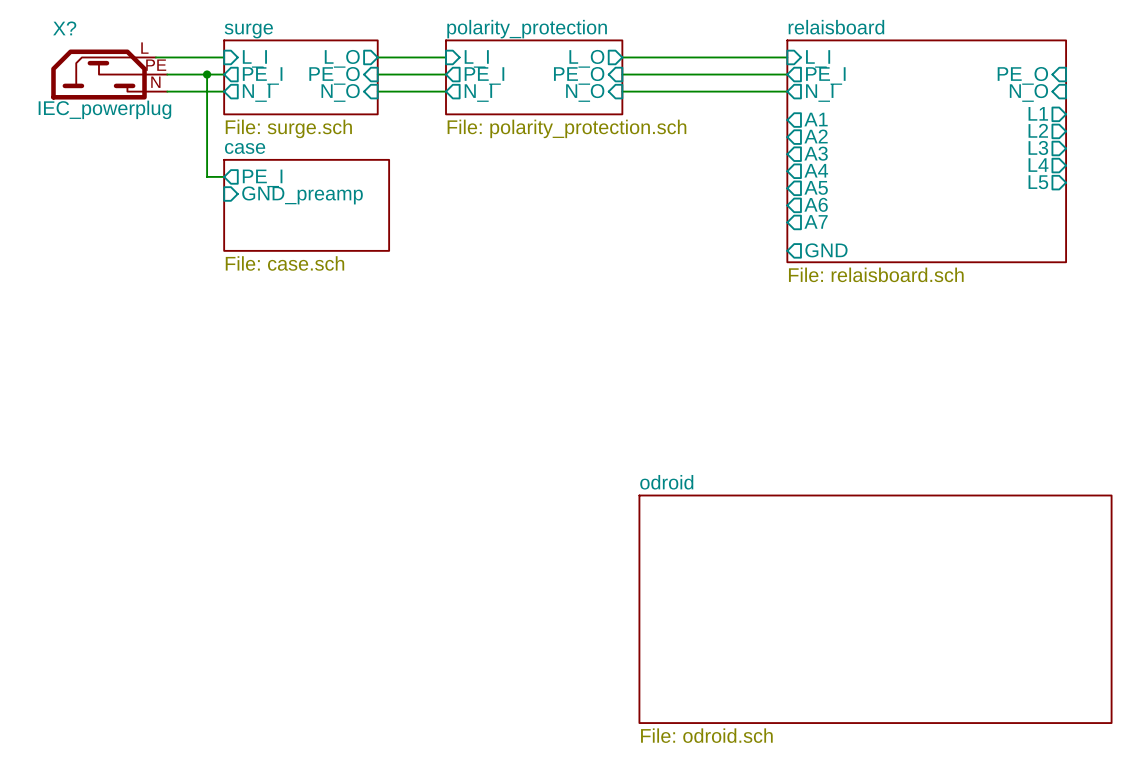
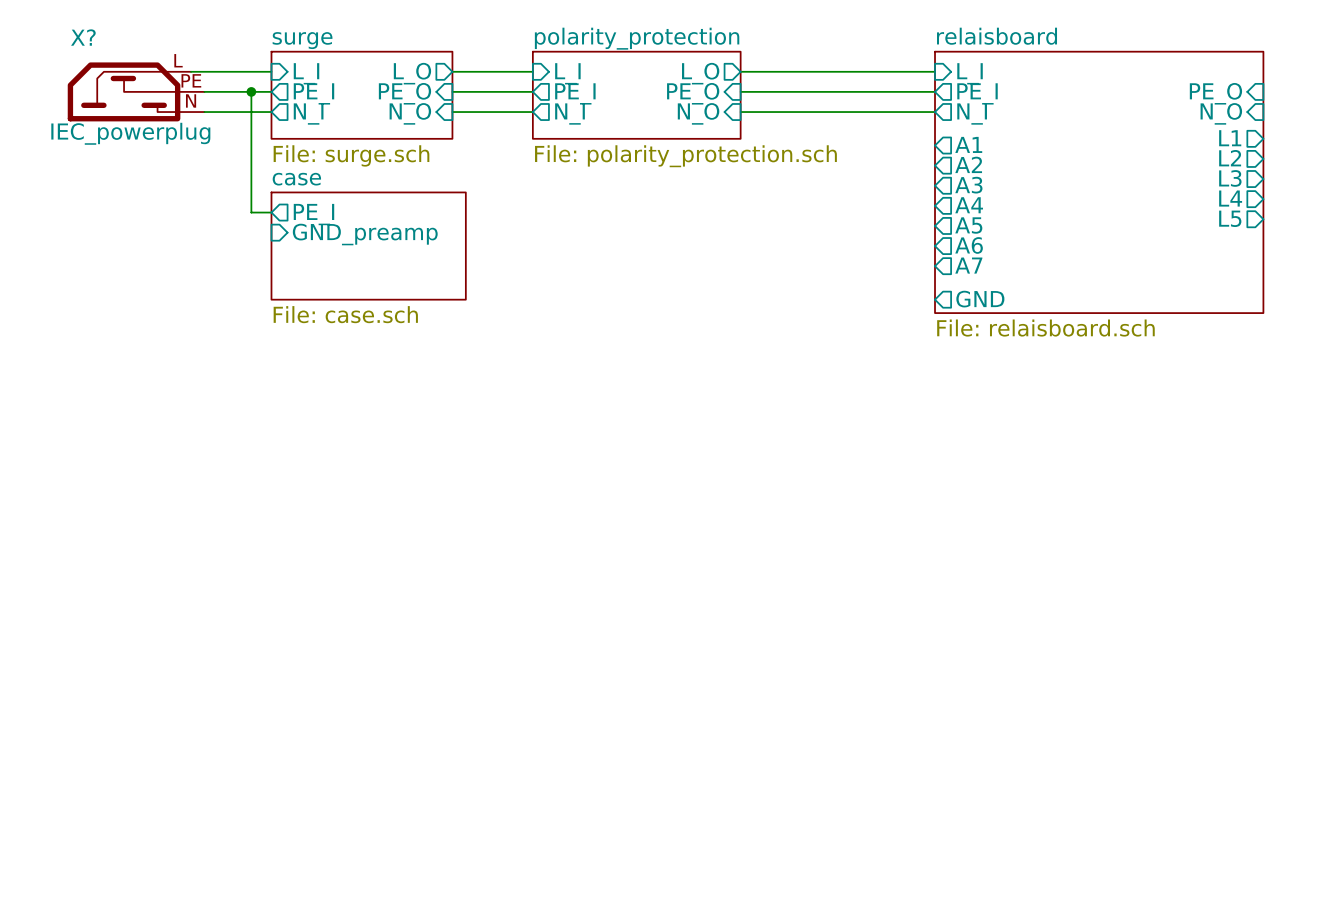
sheet odroid: File: odroid.sch (875, 609) -> none

